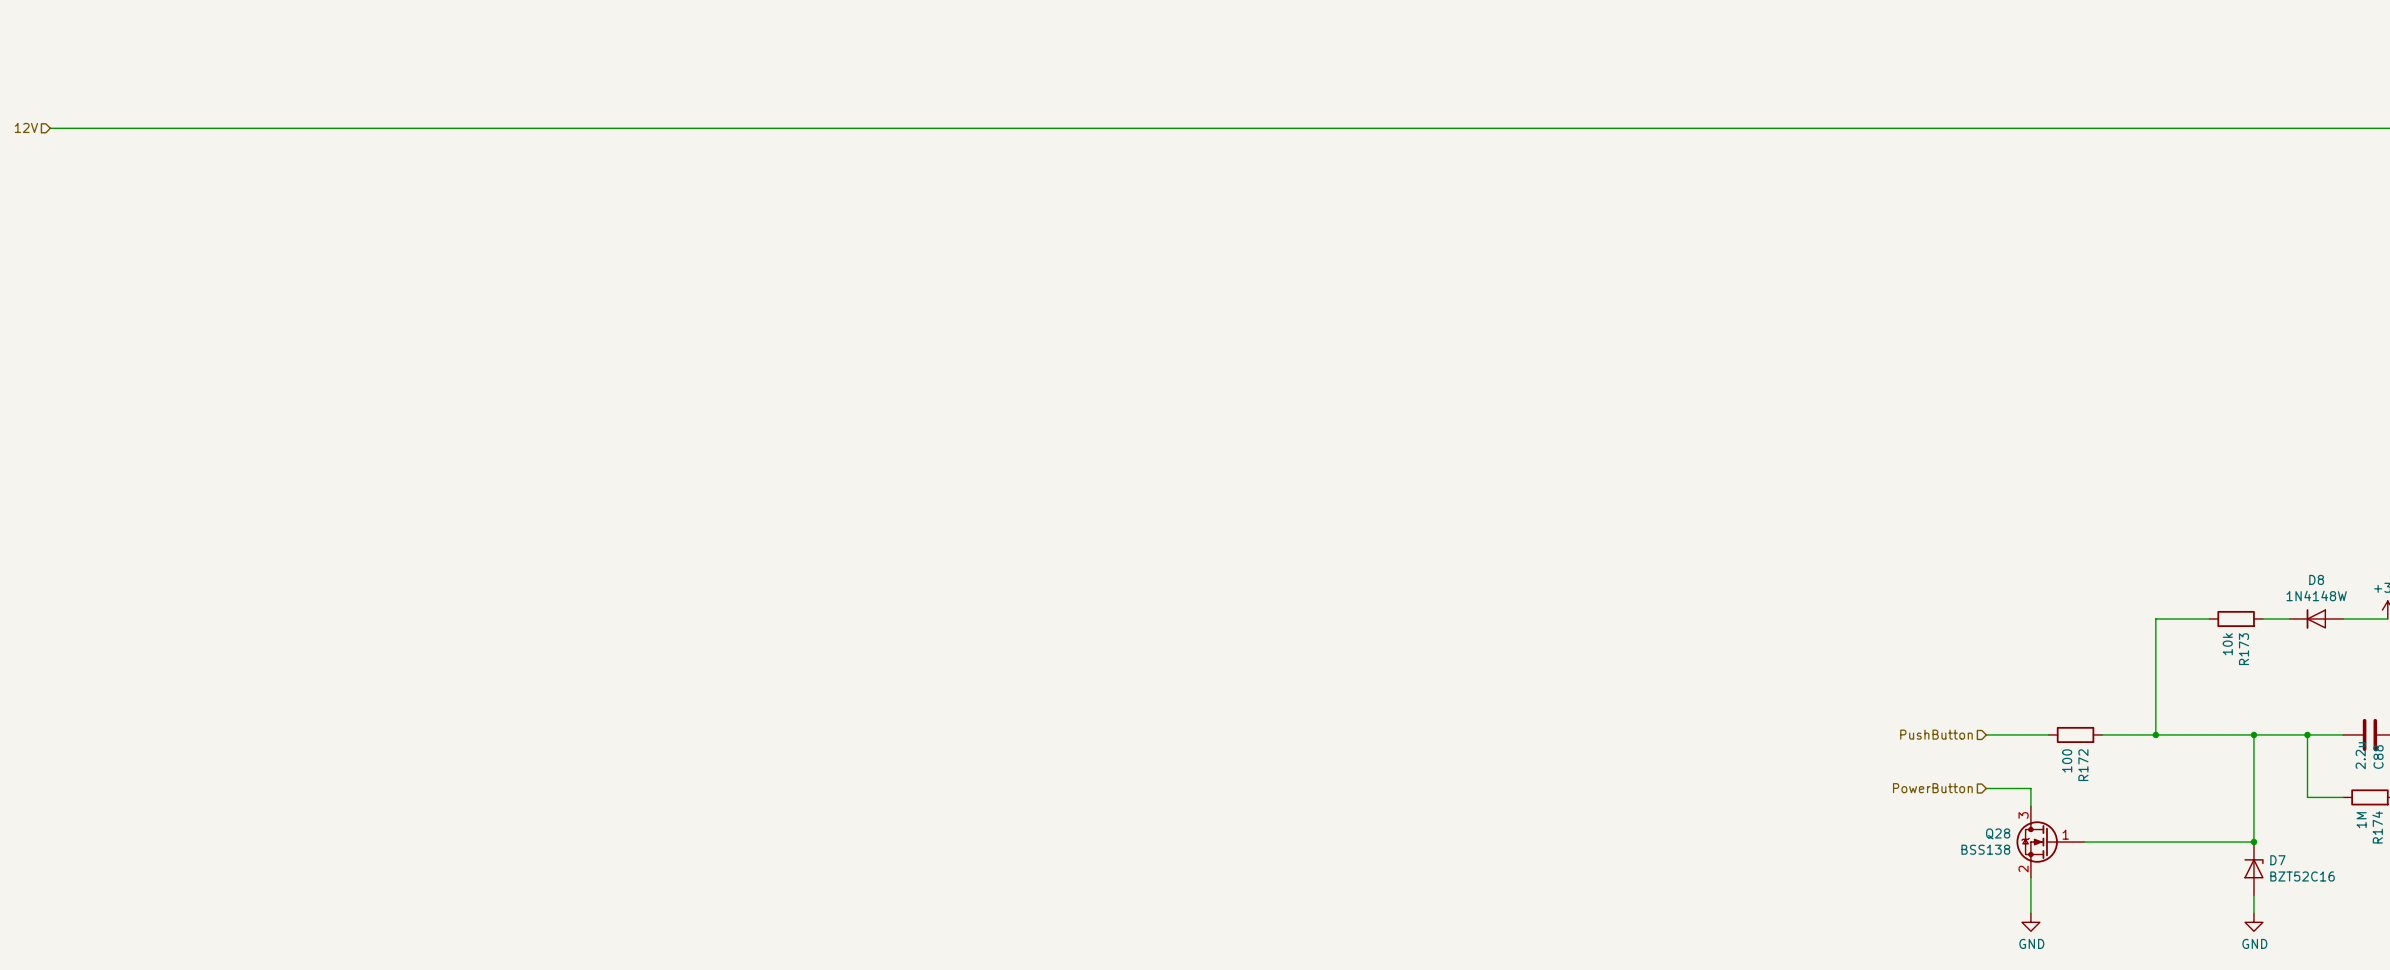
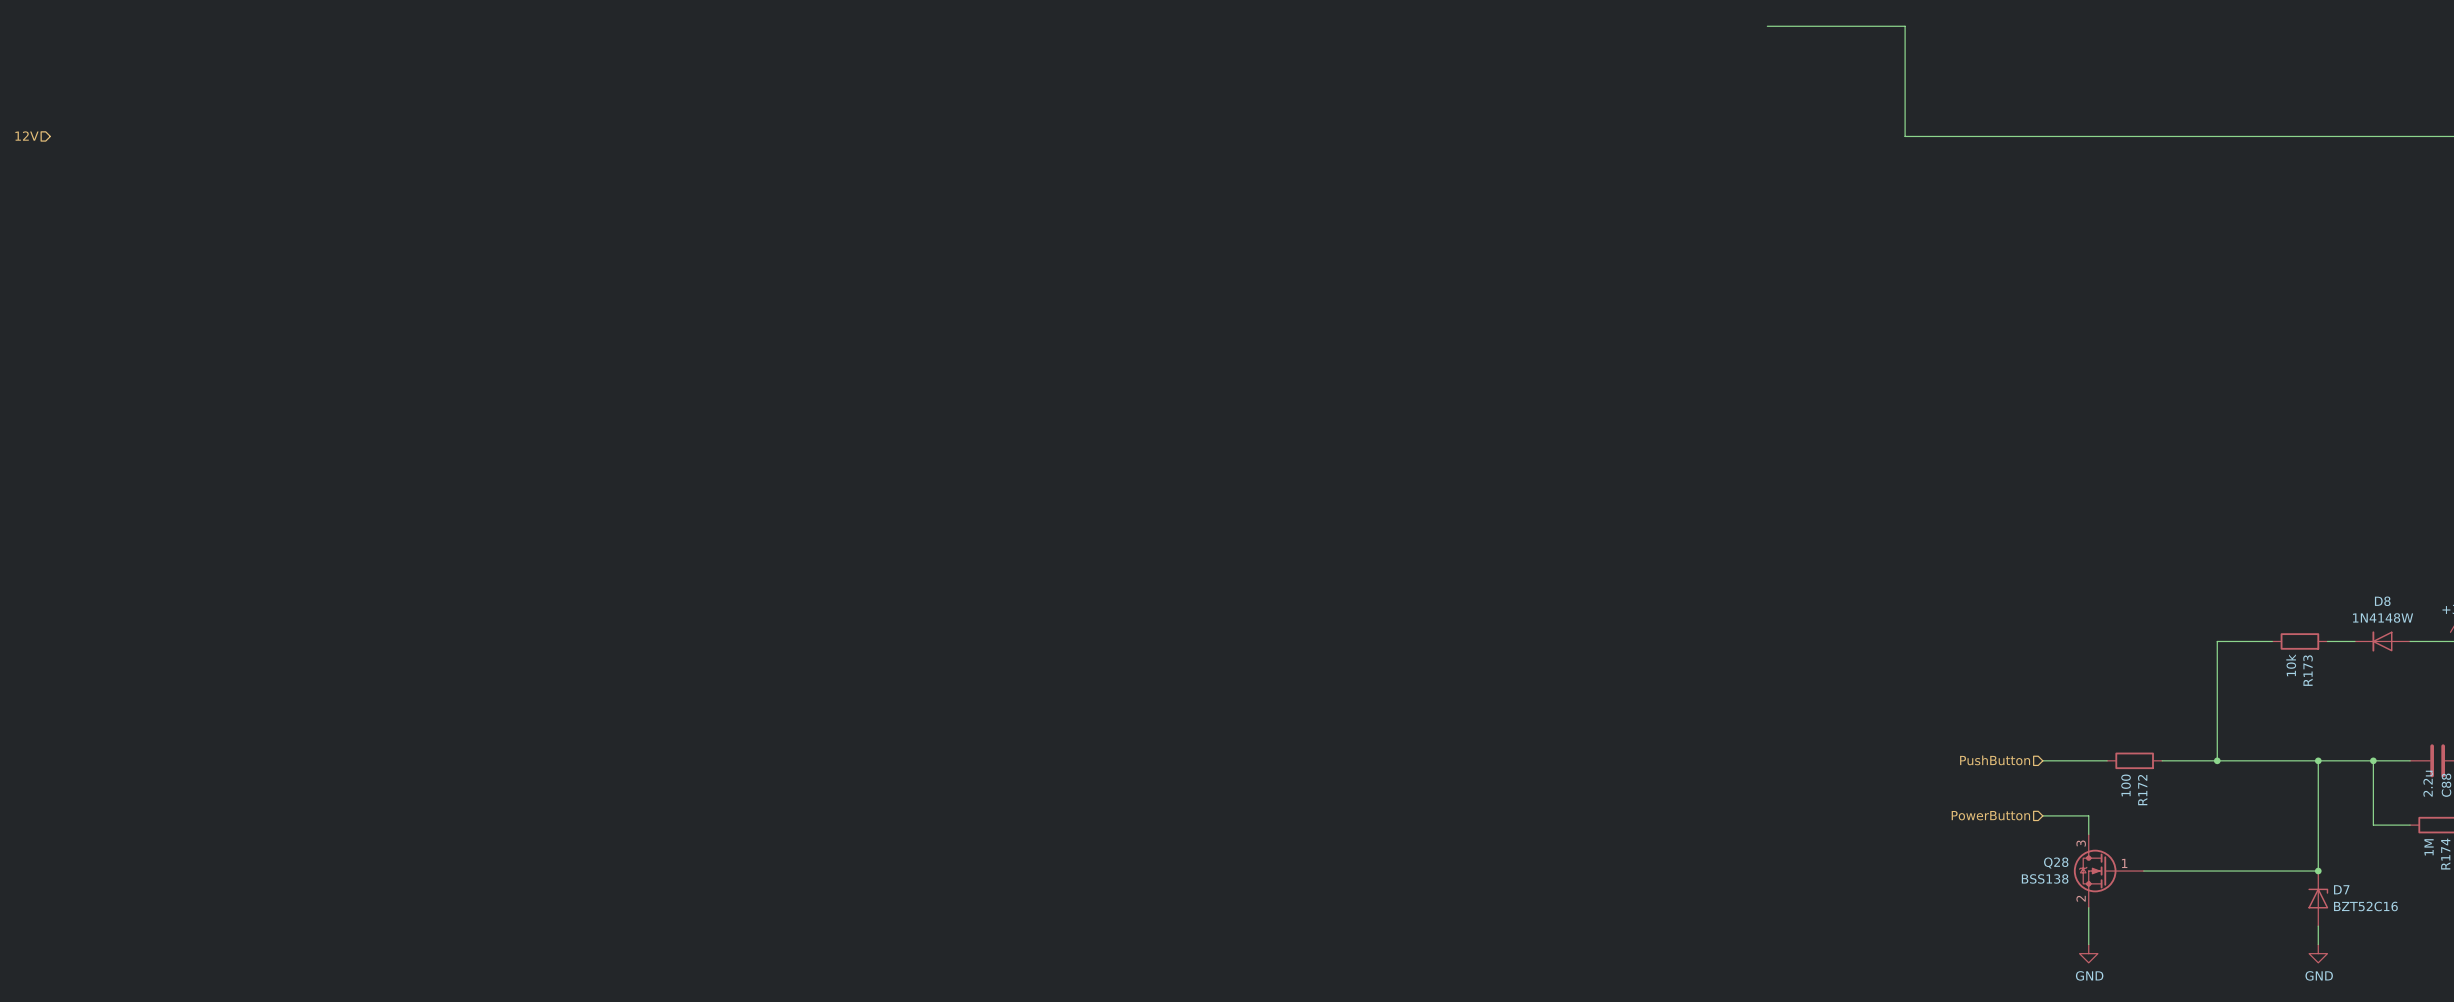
wire: (50, 128) (1852, 128) -> (1767, 26) (1905, 26) (1905, 136)

